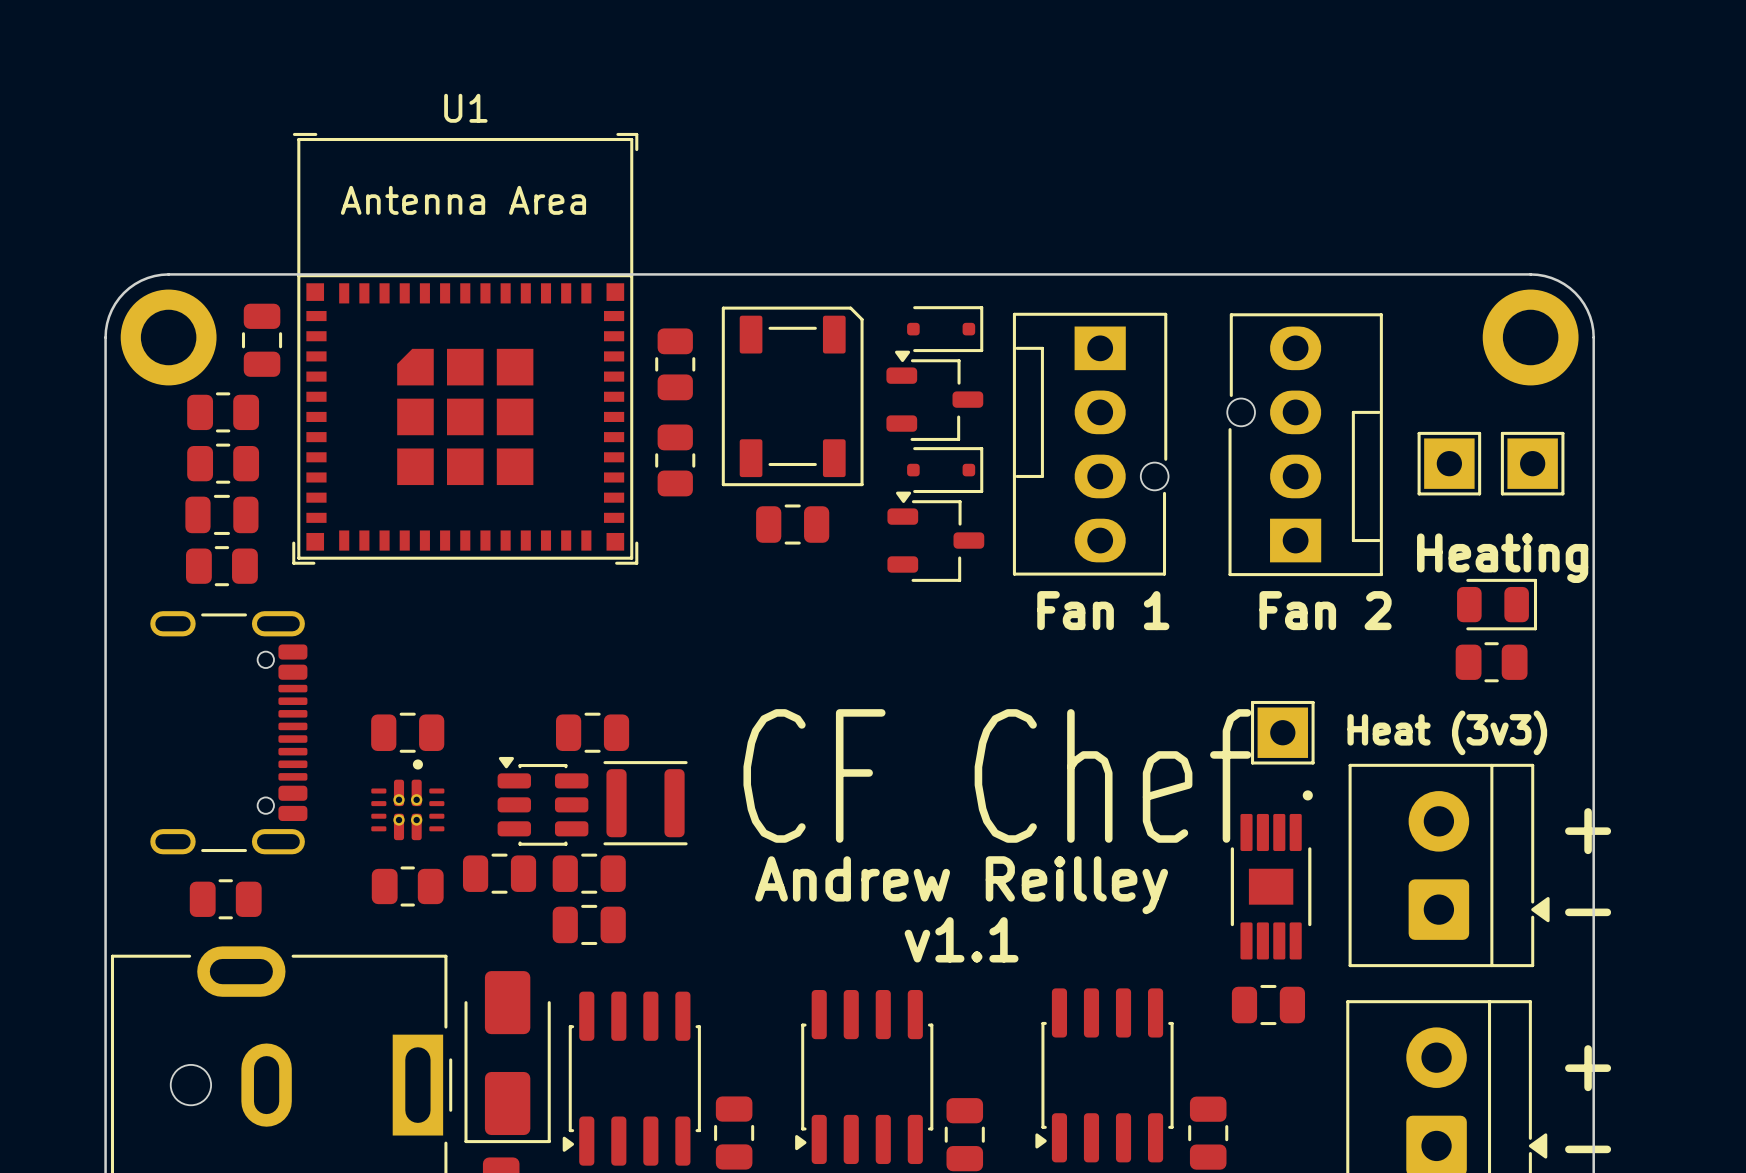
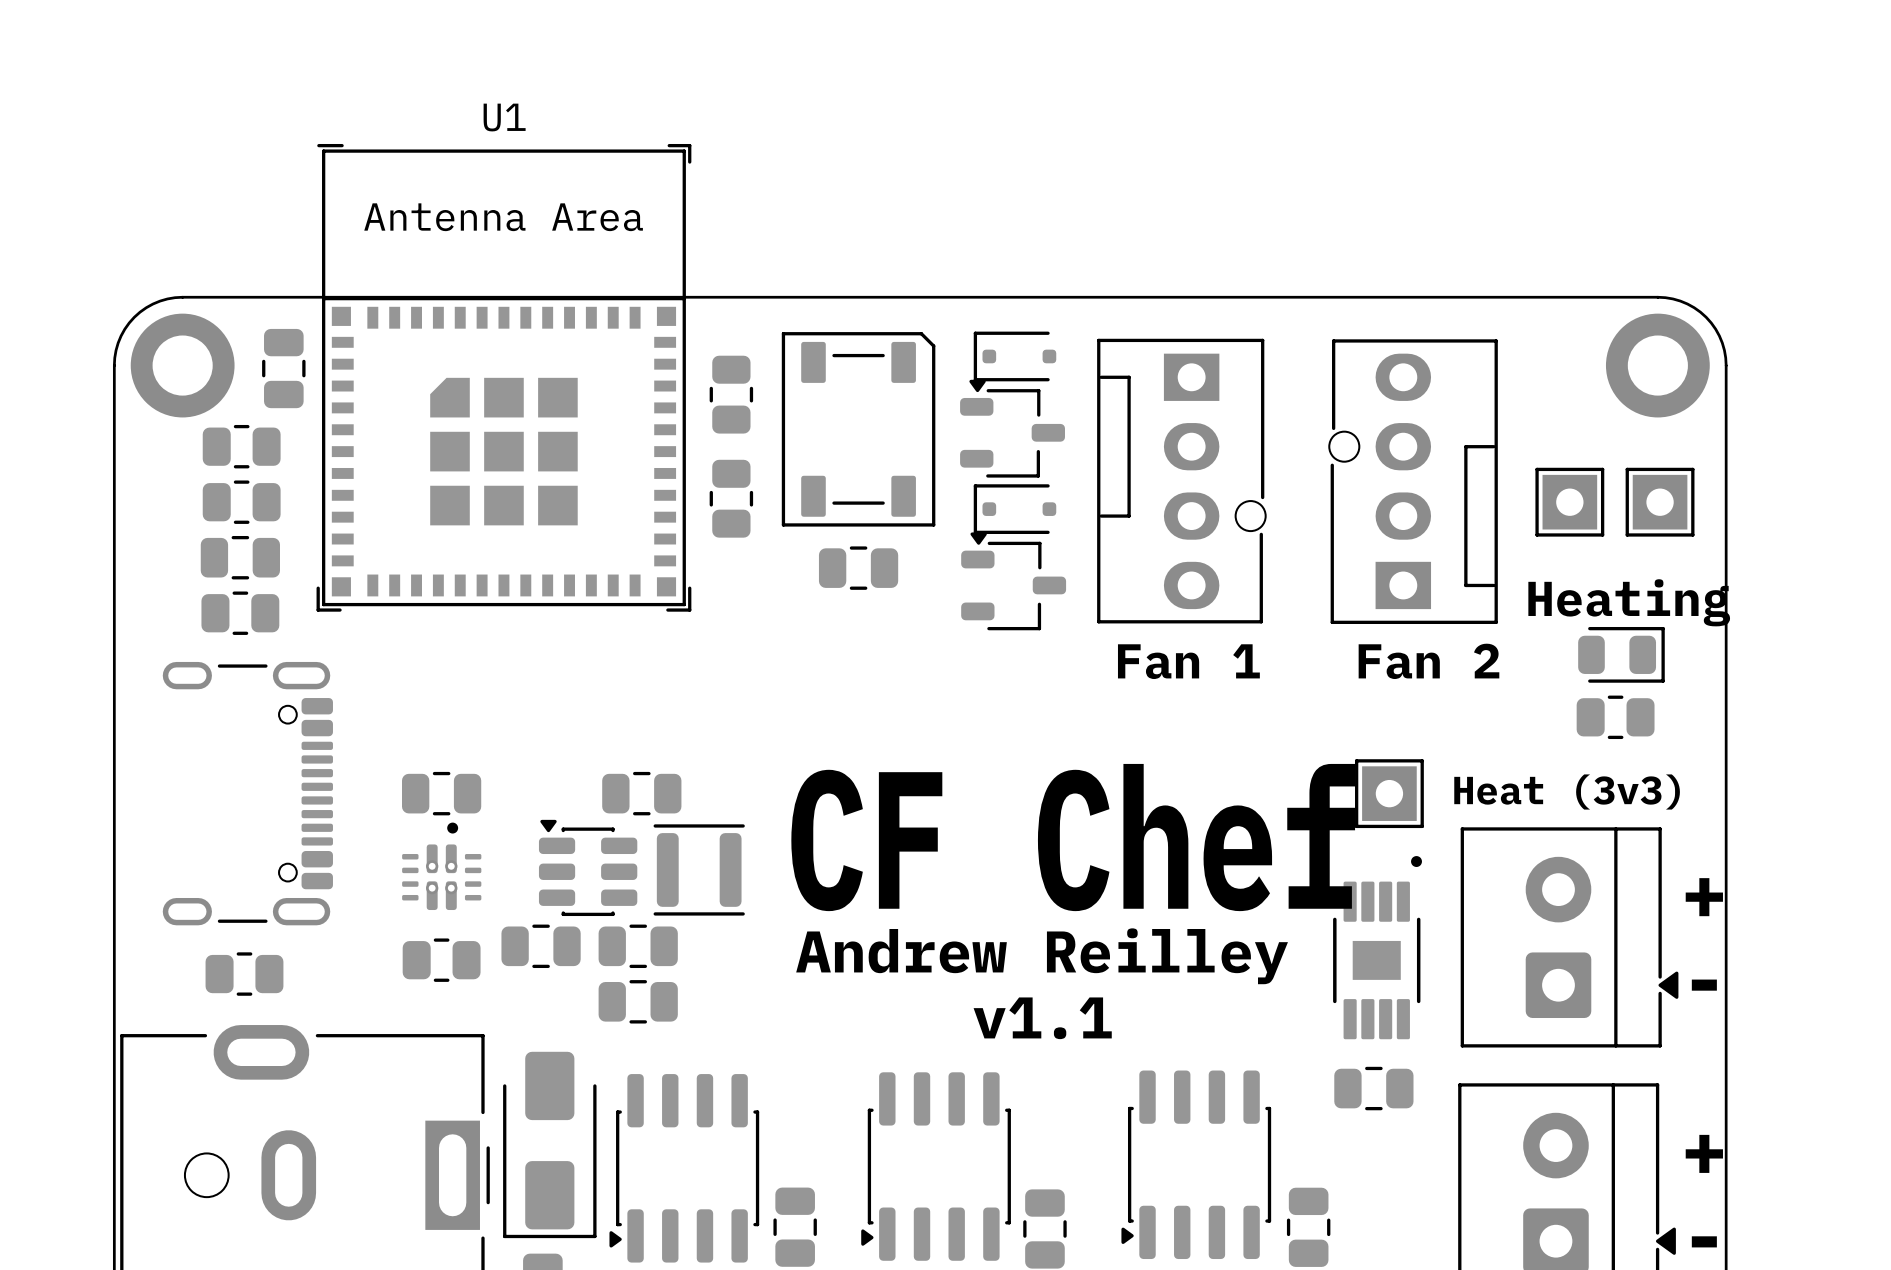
part rotation: 0° (945, 329) -> 180° (1014, 356)
part rotation: 0° (945, 470) -> 180° (1014, 509)

